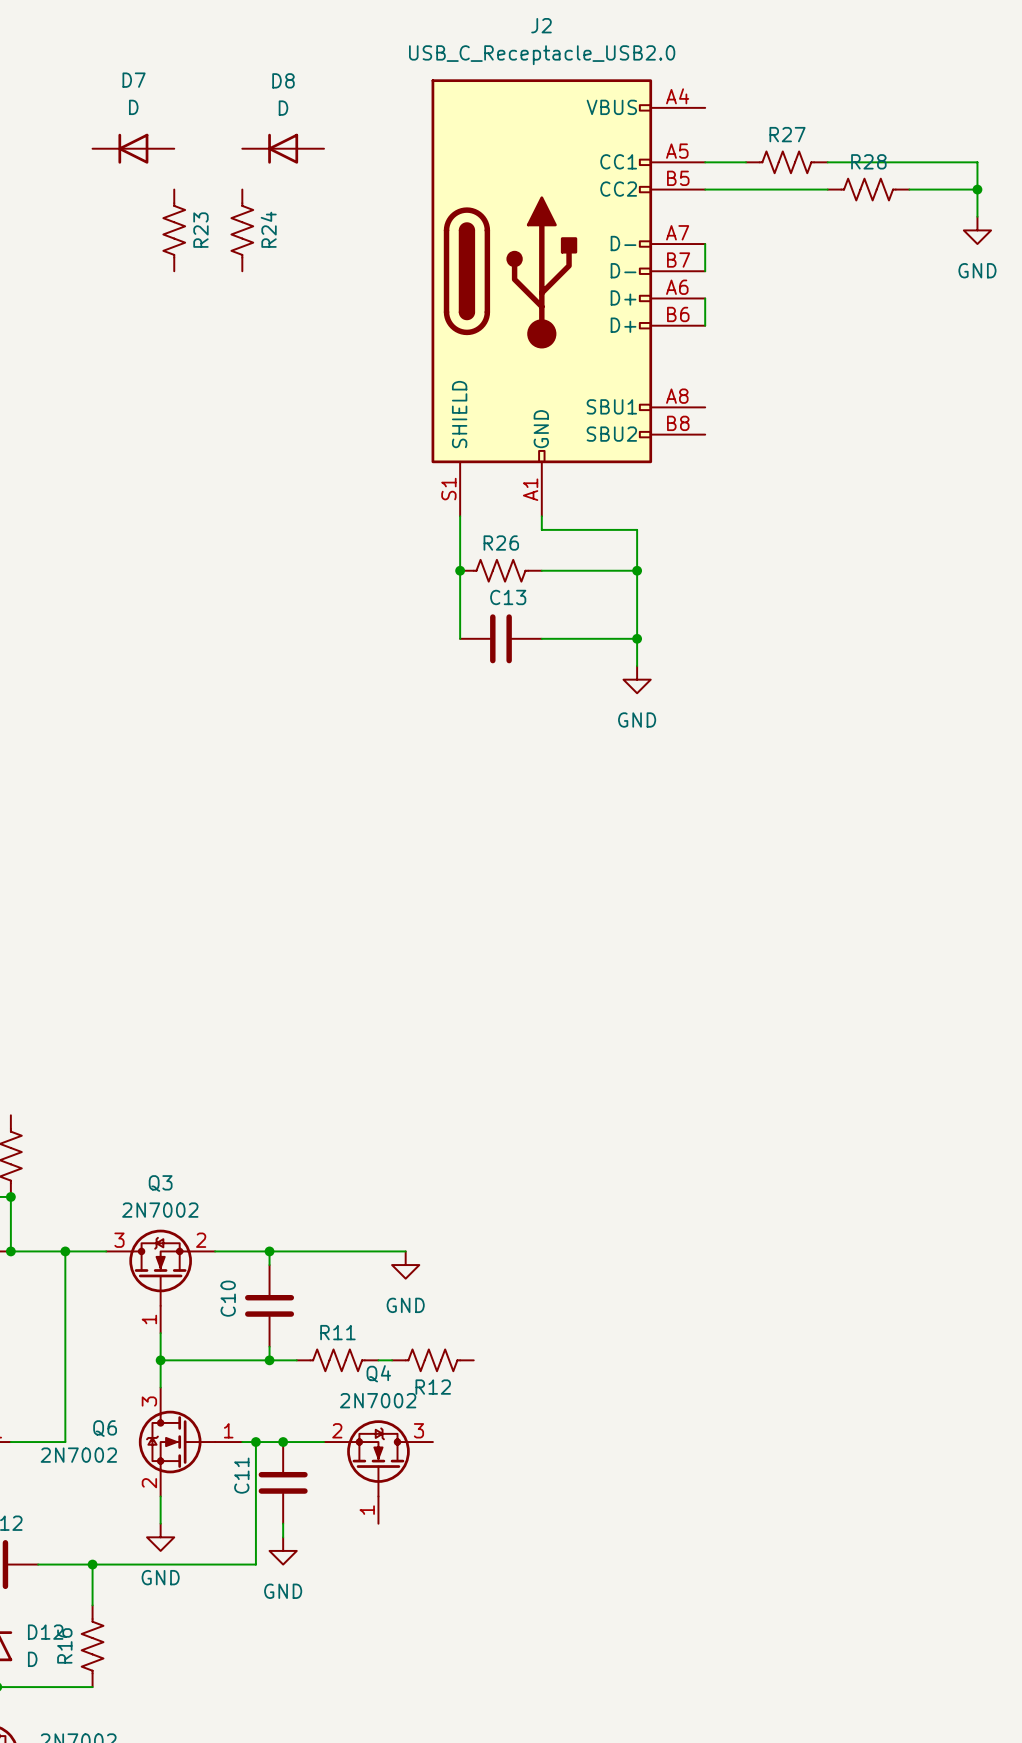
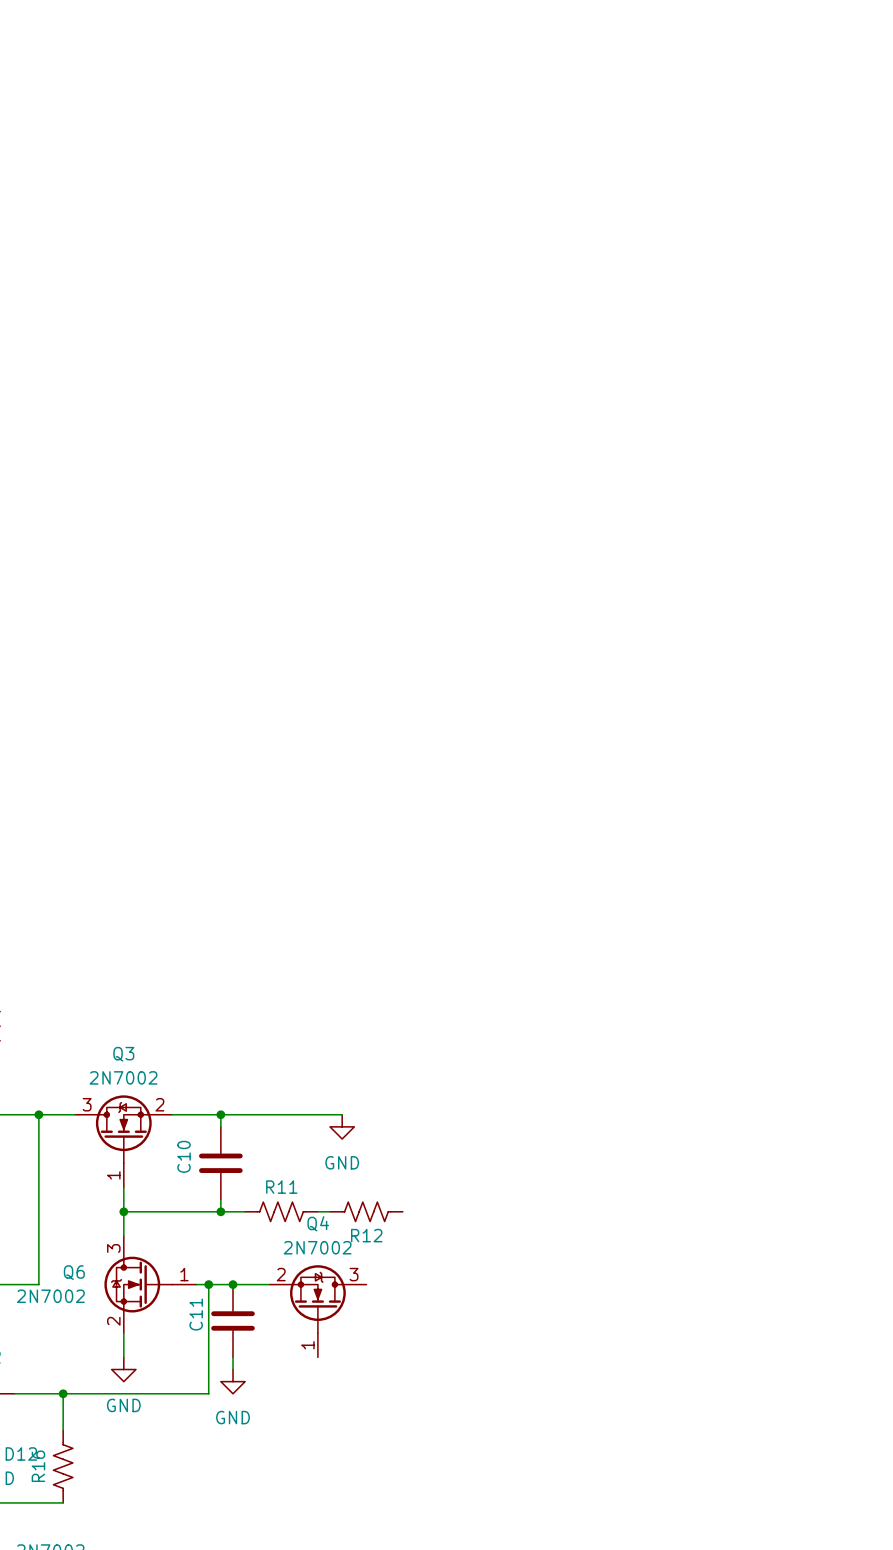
D7: D (133, 148) -> none
D8: D (283, 148) -> none
wire: (705, 162) (746, 162) -> none
R27: (786, 162) -> none
wire: (827, 162) (977, 162) (977, 216) -> none
wire: (705, 189) (827, 189) -> none
R28: (868, 189) -> none
wire: (909, 189) (977, 189) -> none
junction: (977, 189) -> none
R23: (174, 230) -> none
R24: (242, 230) -> none
power symbol: GND (977, 230) -> none
wire: (705, 244) (705, 271) -> none
J2: USB_C_Receptacle_USB2.0 (568, 297) -> none
wire: (705, 298) (705, 325) -> none
wire: (460, 516) (460, 638) -> none
wire: (541, 516) (541, 529) (637, 529) (637, 666) -> none
junction: (460, 570) -> none
R26: (500, 570) -> none
wire: (541, 570) (637, 570) -> none
junction: (637, 570) -> none
C13: (500, 638) -> none
wire: (541, 638) (637, 638) -> none
junction: (637, 638) -> none
power symbol: GND (637, 679) -> none

